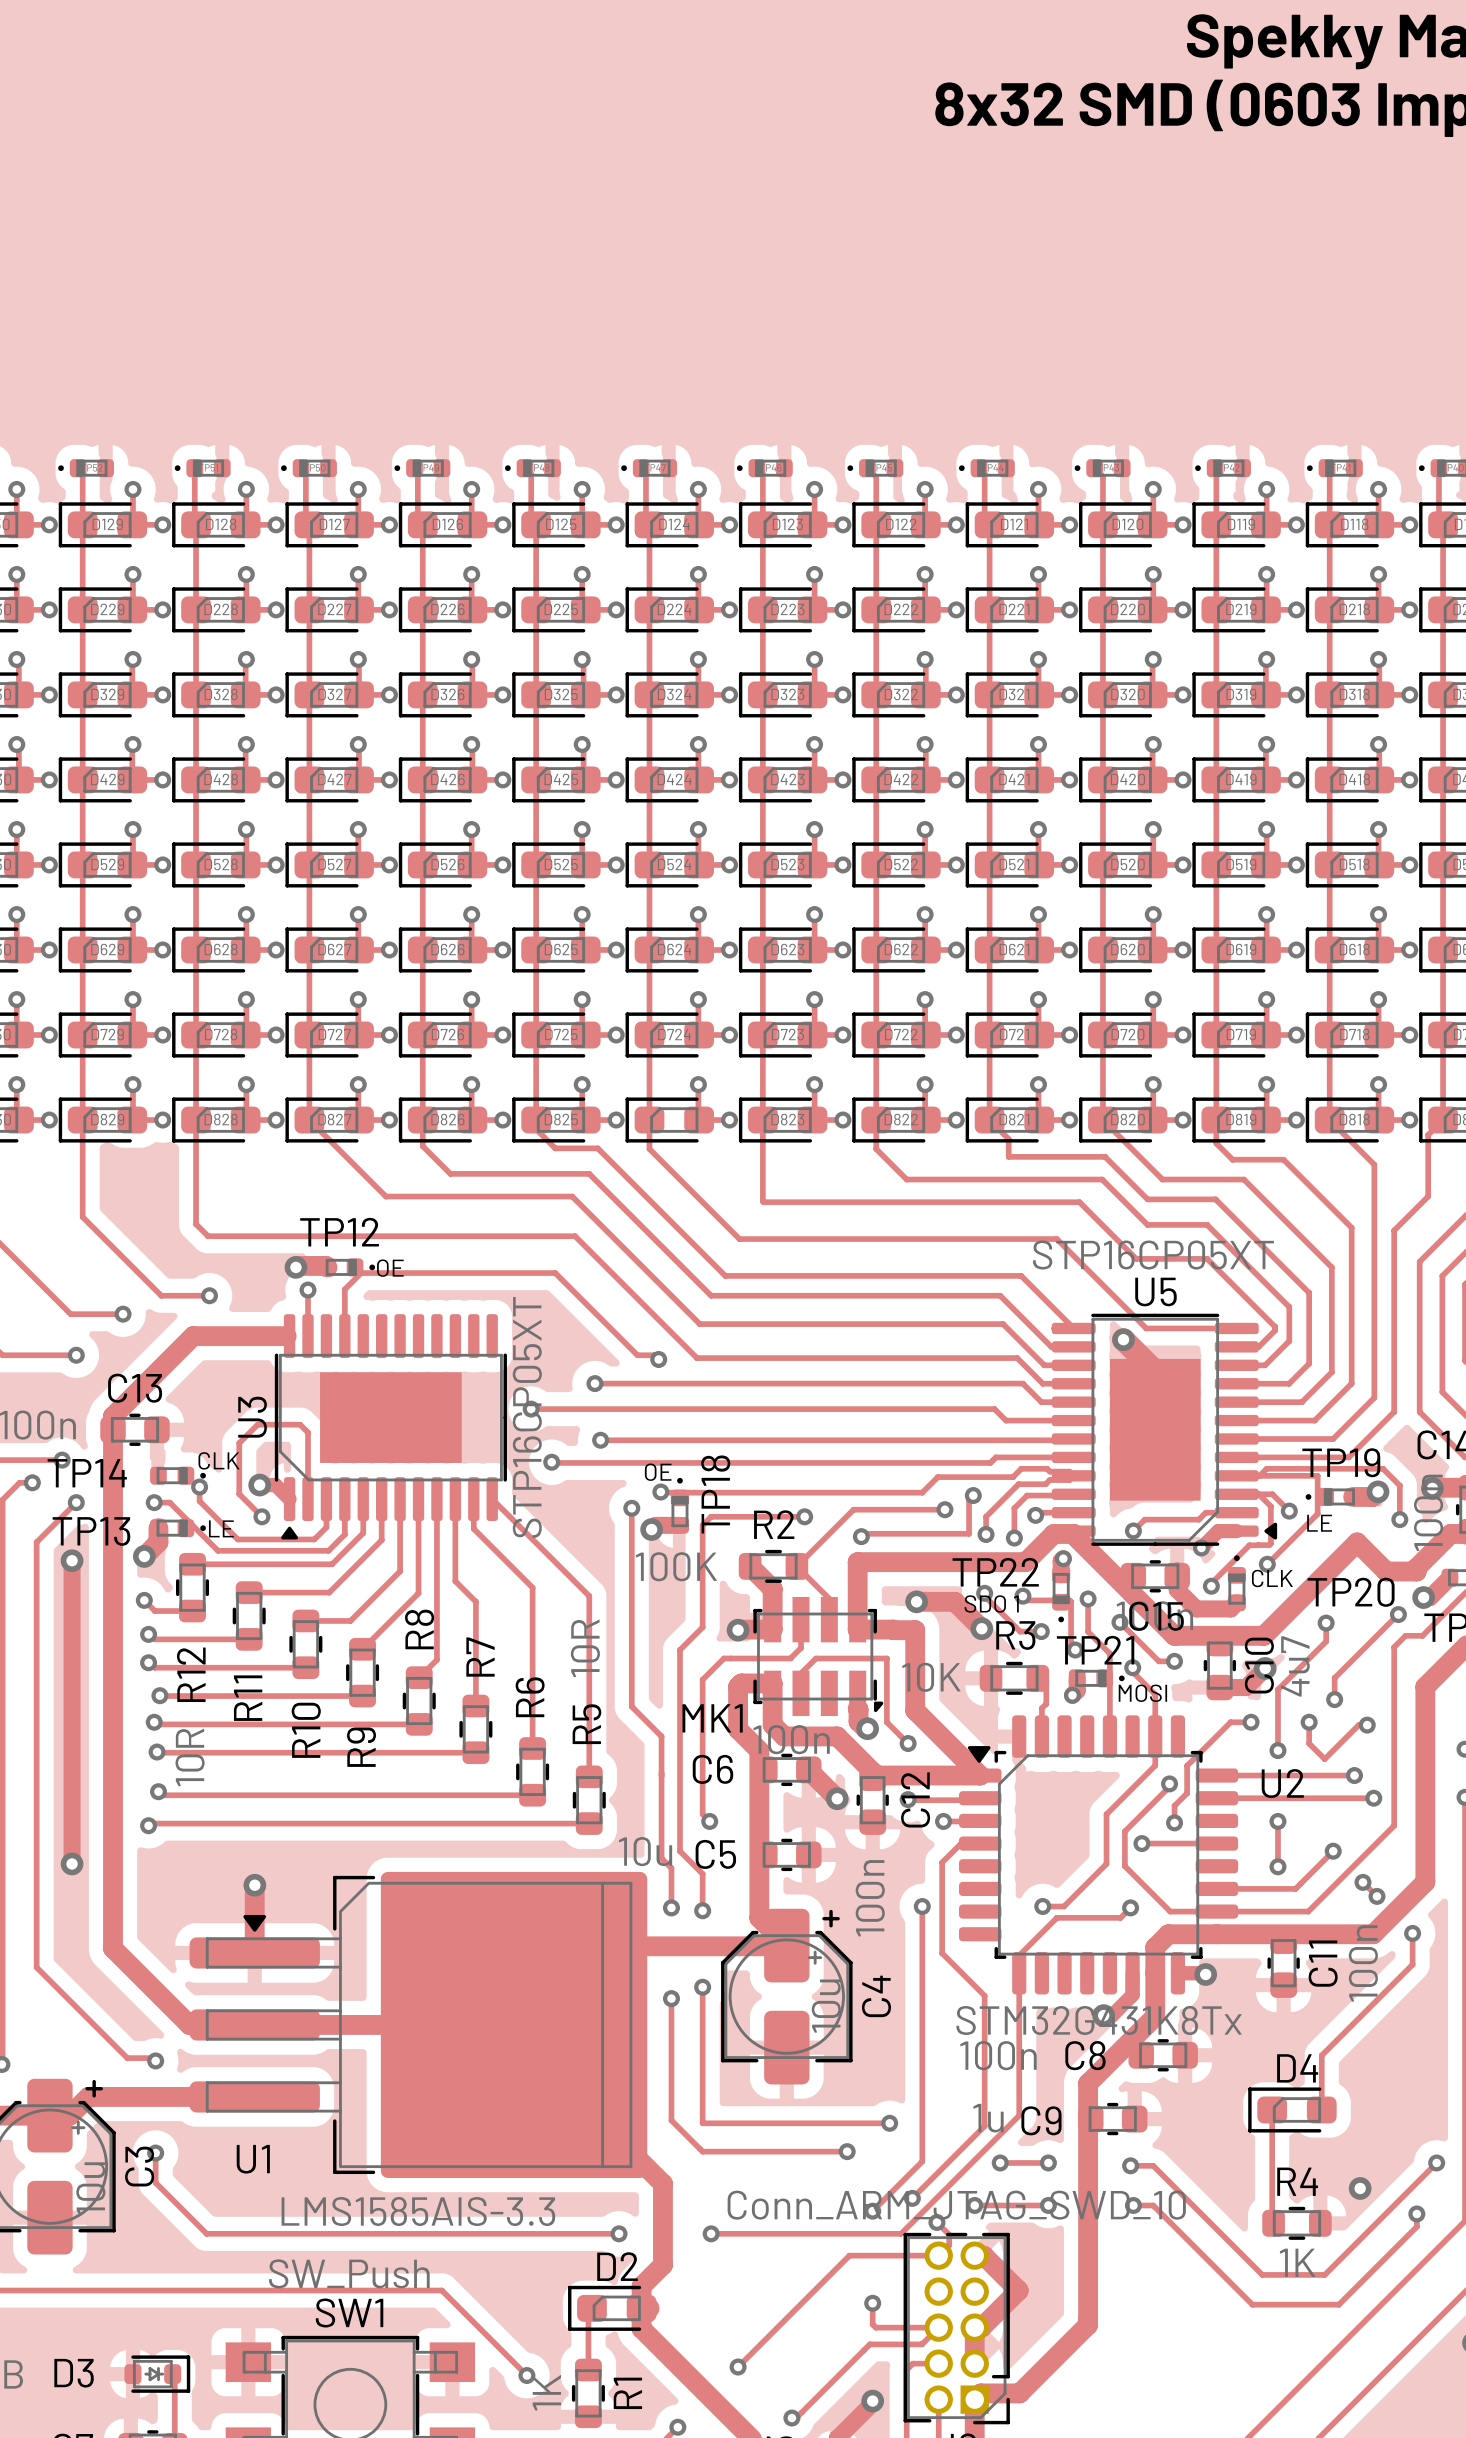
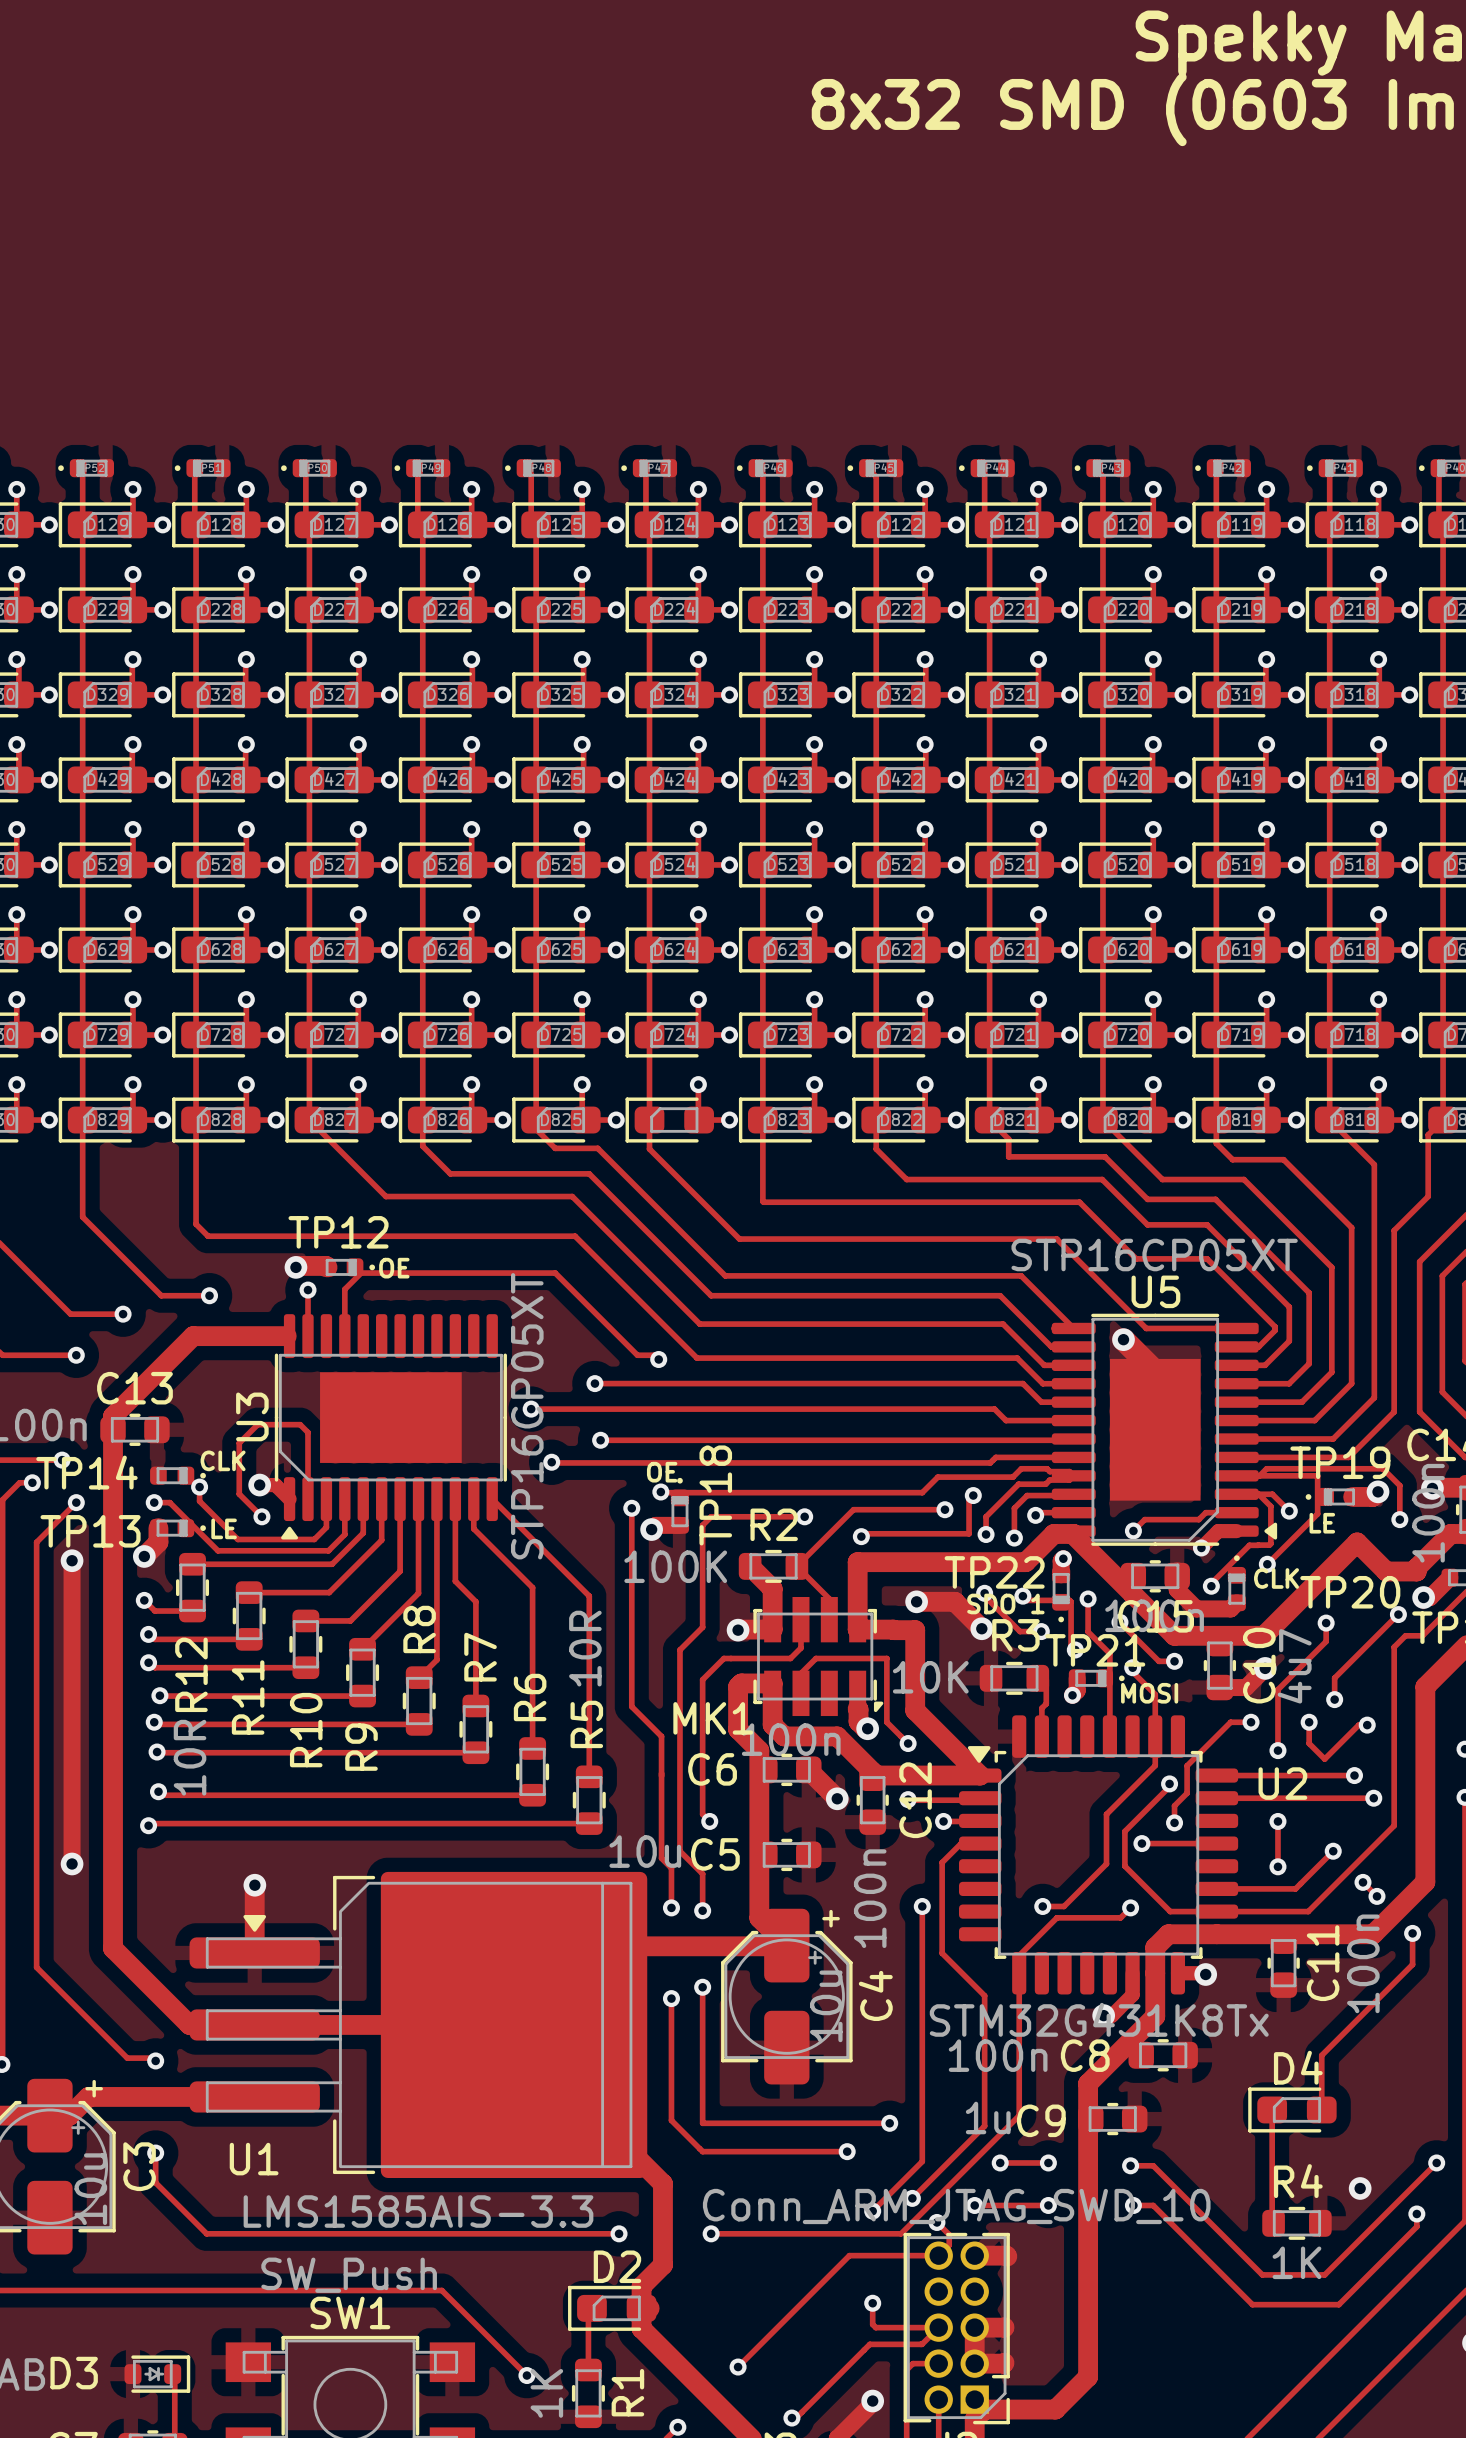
track: (983, 2255) (1018, 2290) (981, 2327) -> (1004, 2327) (981, 2327)
track: none -> (983, 2255) (1007, 2256)
track: (1088, 2324) (1019, 2393) (980, 2393) (974, 2399) (974, 2419) -> (1088, 2324) (1088, 2376) (1055, 2409) (984, 2409)
track: none -> (1004, 2362) (974, 2363)

